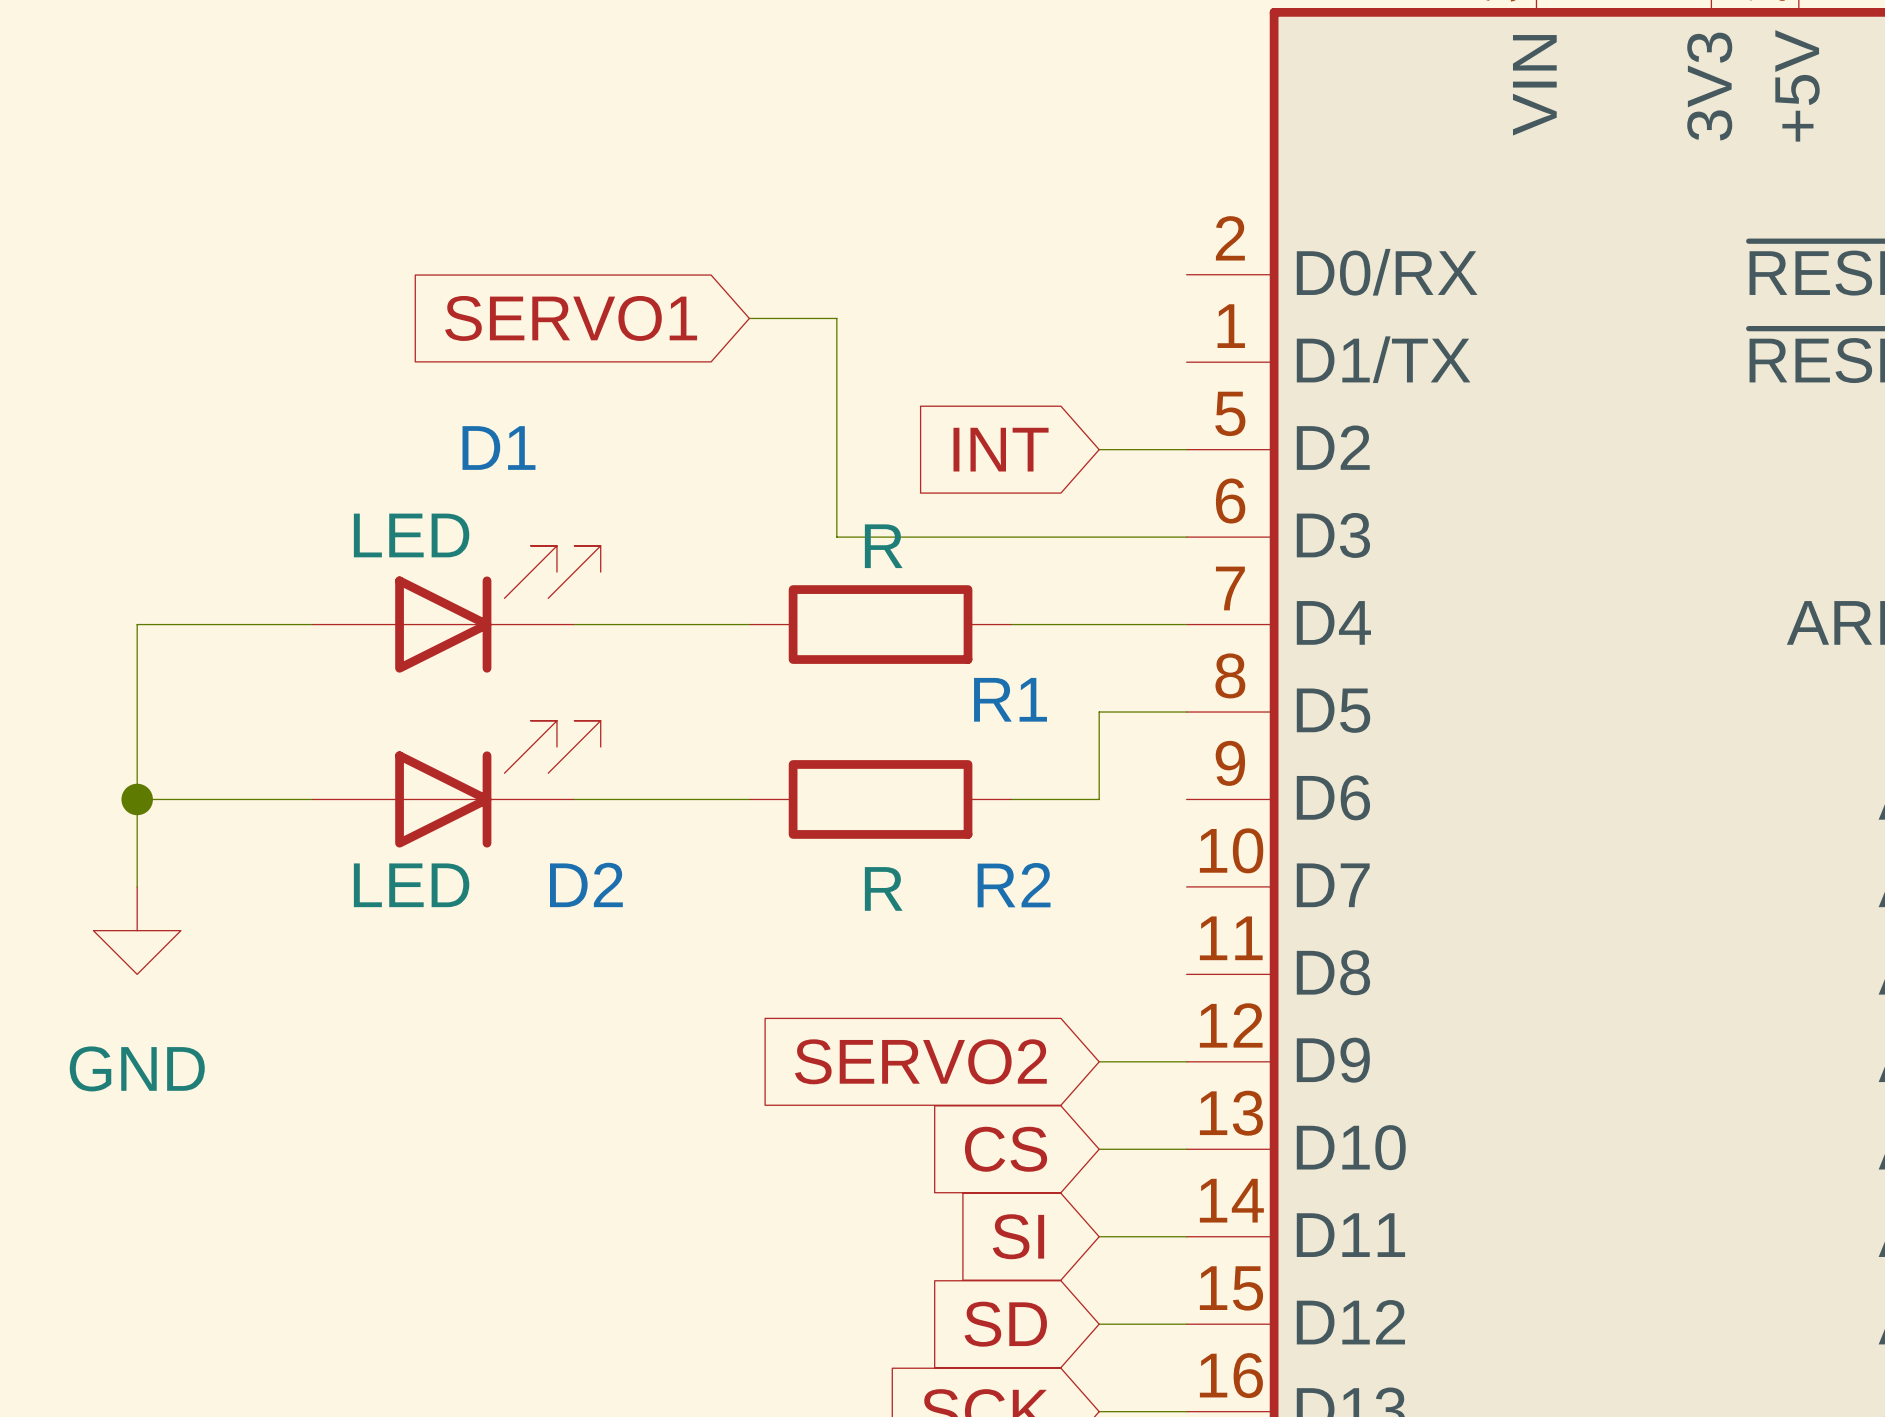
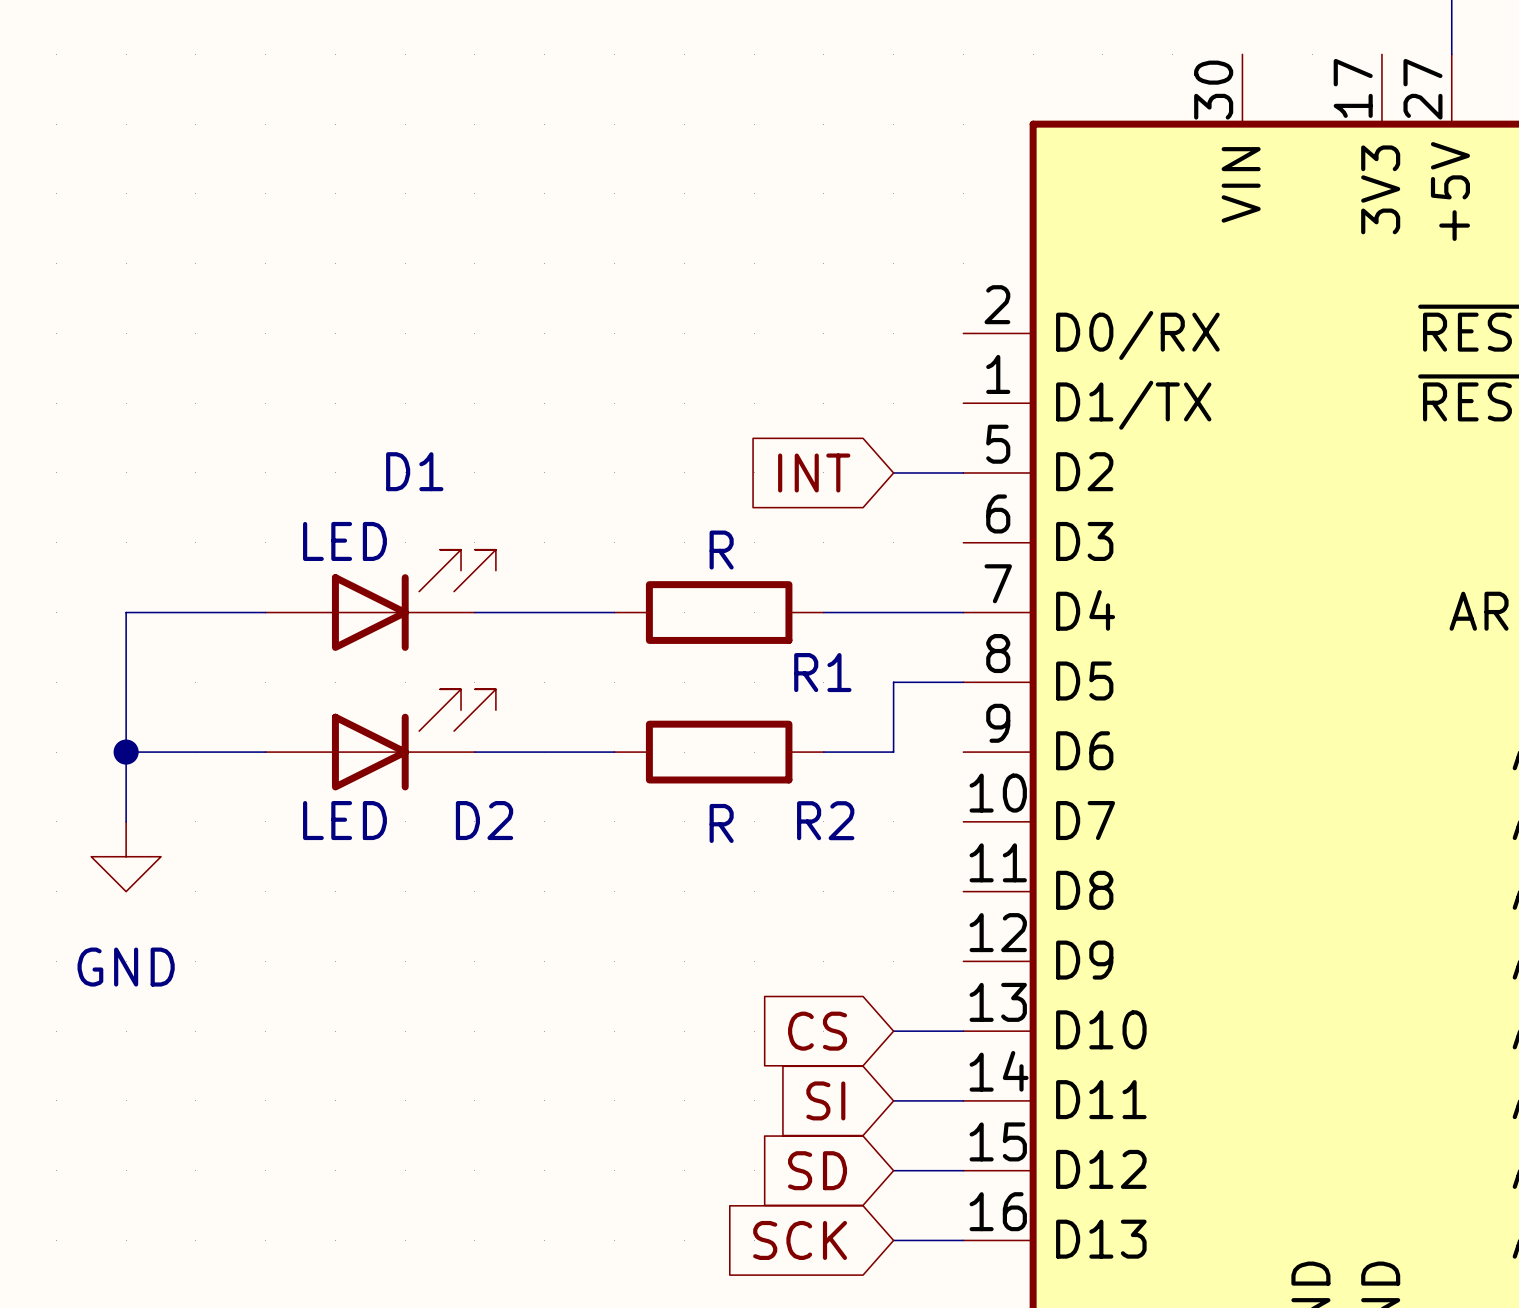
global label: SERVO1 (571, 318) -> none
wire: (749, 318) (836, 318) (836, 537) (1186, 537) -> none
global label: SERVO2 (920, 1061) -> none
wire: (1099, 1061) (1186, 1061) -> none

